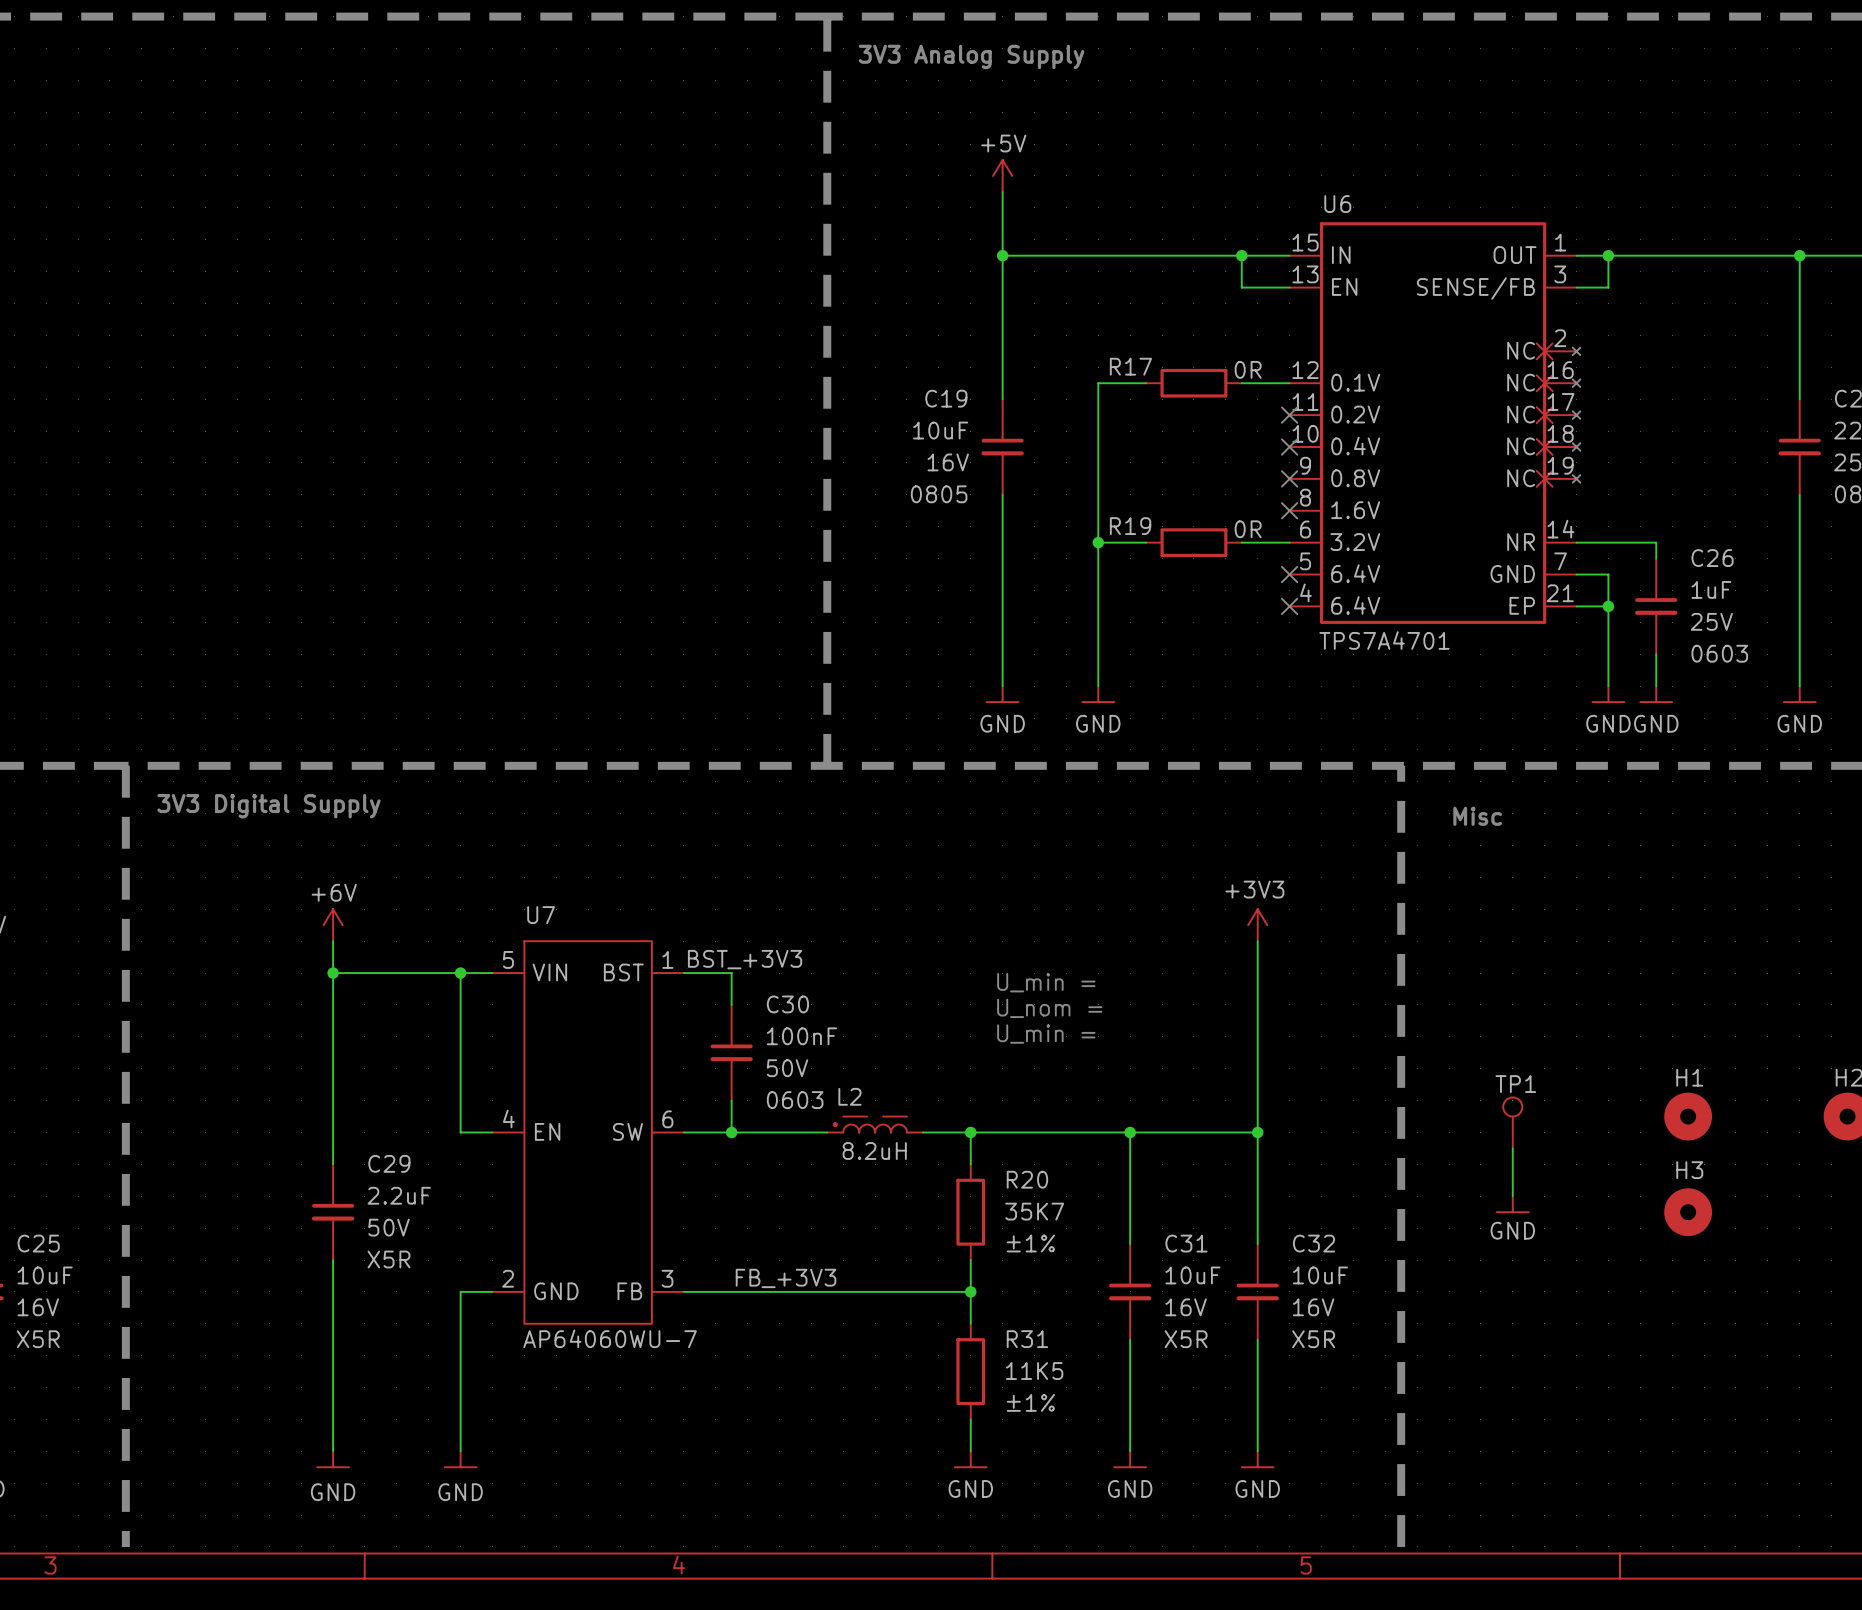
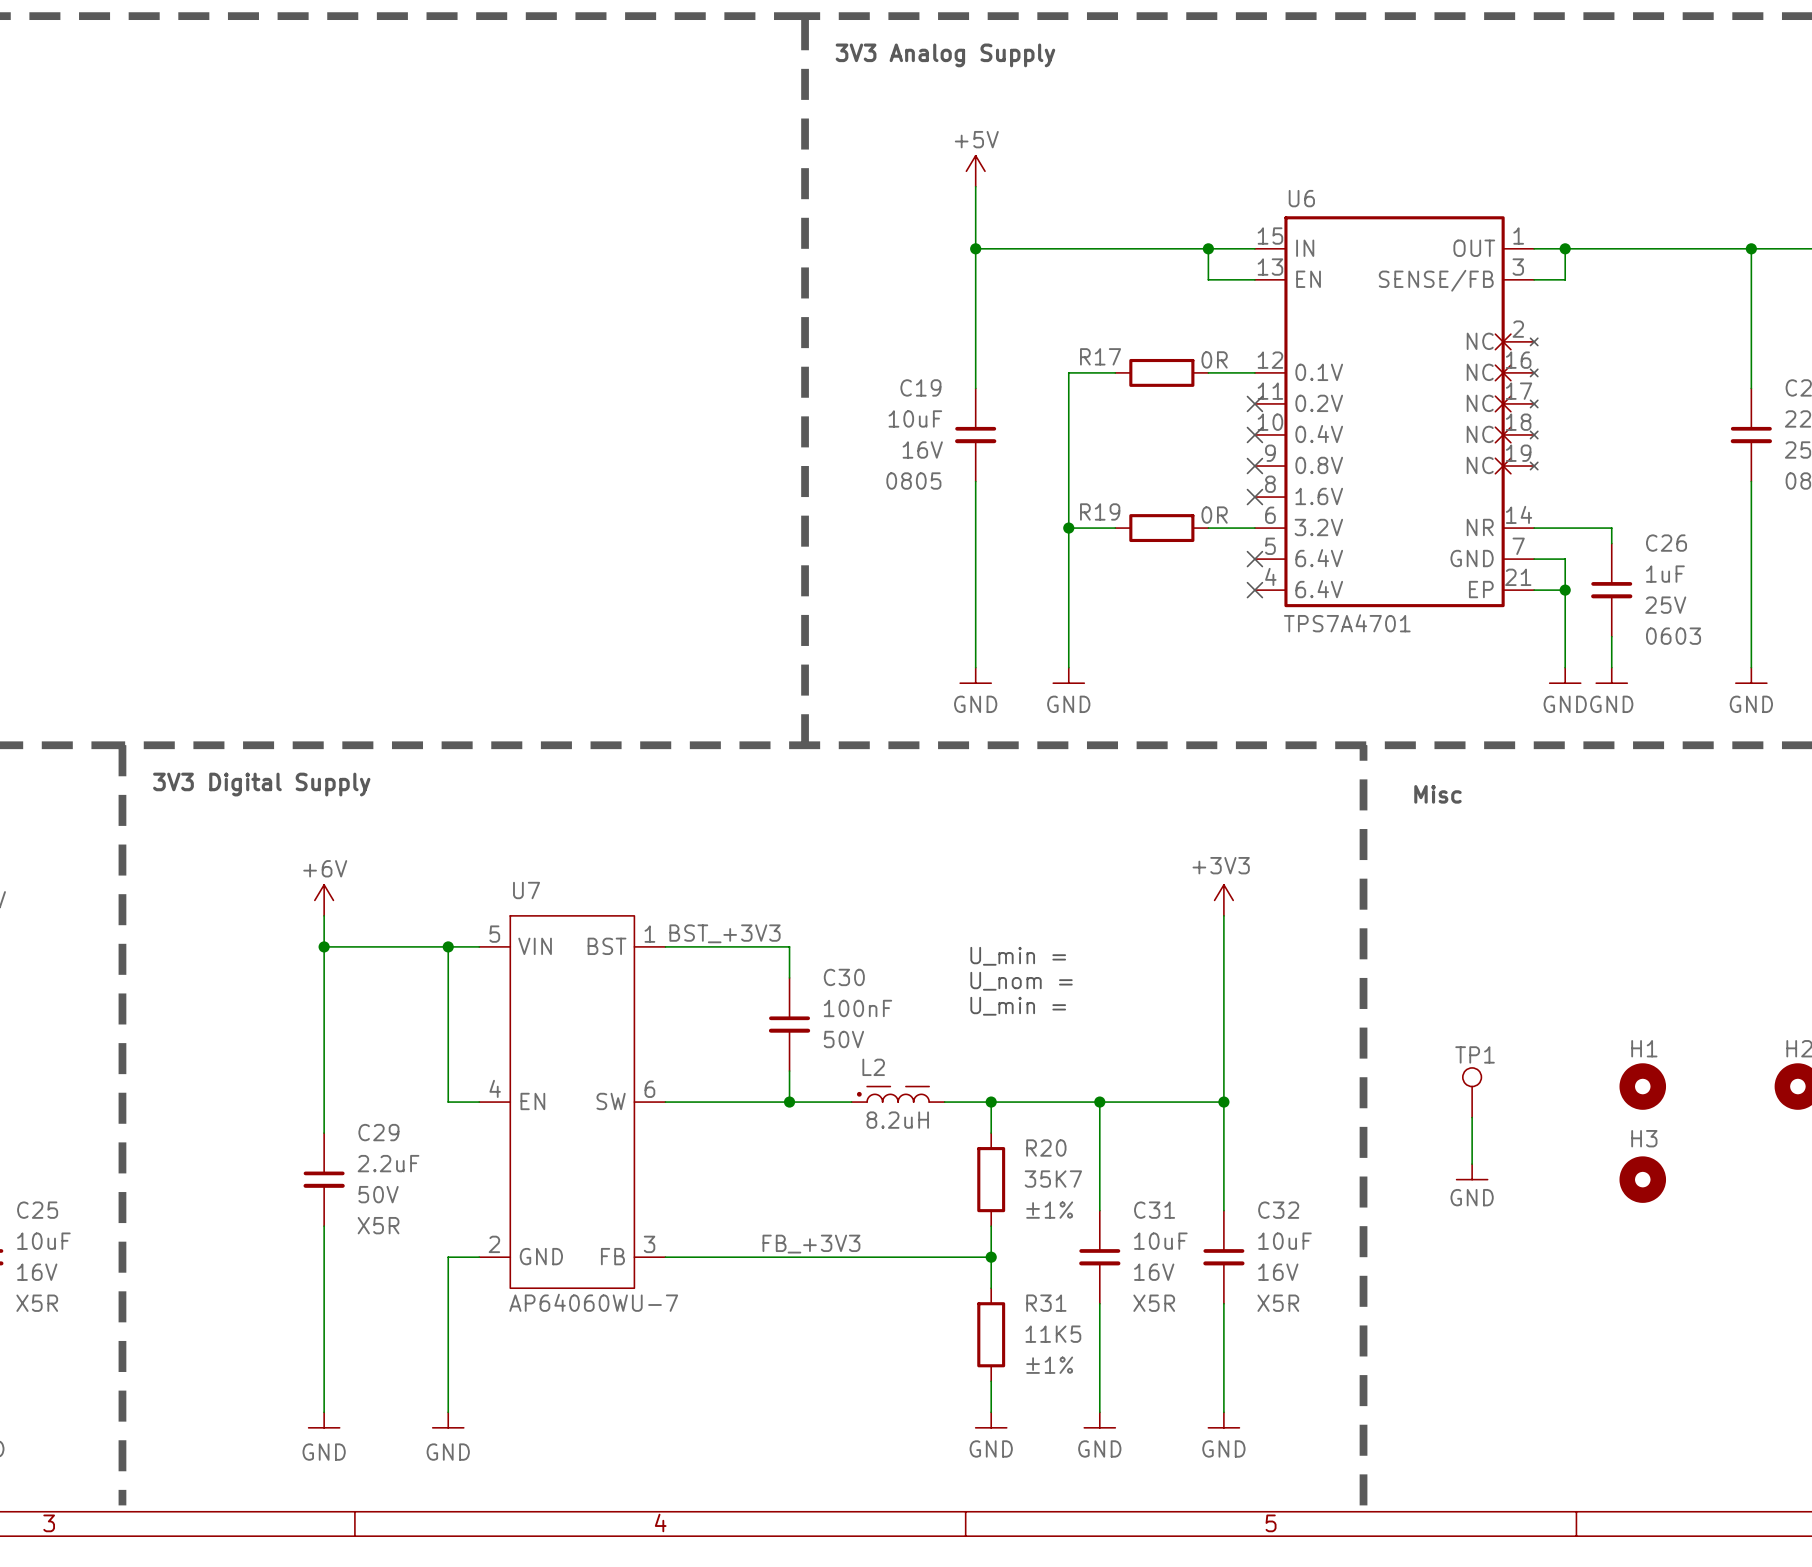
wire: (731, 973) (731, 1004) -> (711, 946) (789, 946) (789, 977)
C30 position: (731, 1052) -> (789, 1024)
wire: (731, 1100) (731, 1132) -> (789, 1071) (789, 1102)
C30 text: 0603 (795, 1100) -> none
L2 position: (875, 1124) -> (898, 1094)
junction: (731, 1132) -> none
junction: none -> (789, 1102)
wire: none -> (805, 1102) (851, 1102)
wire: (922, 1132) (970, 1132) (970, 1164) -> none
junction position: (970, 1132) -> (991, 1102)
wire: none -> (991, 1102) (991, 1133)
R20 position: (970, 1212) -> (991, 1179)
wire: (970, 1260) (970, 1323) -> (991, 1226) (991, 1288)
label position: FB_+3V3 (786, 1278) -> FB_+3V3 (811, 1244)
wire: none -> (944, 1257) (991, 1257)
junction position: (970, 1291) -> (991, 1257)
R31 position: (970, 1371) -> (991, 1334)
wire: (970, 1419) (970, 1451) -> (991, 1381) (991, 1412)
power symbol position: GND (970, 1459) -> GND (991, 1420)

